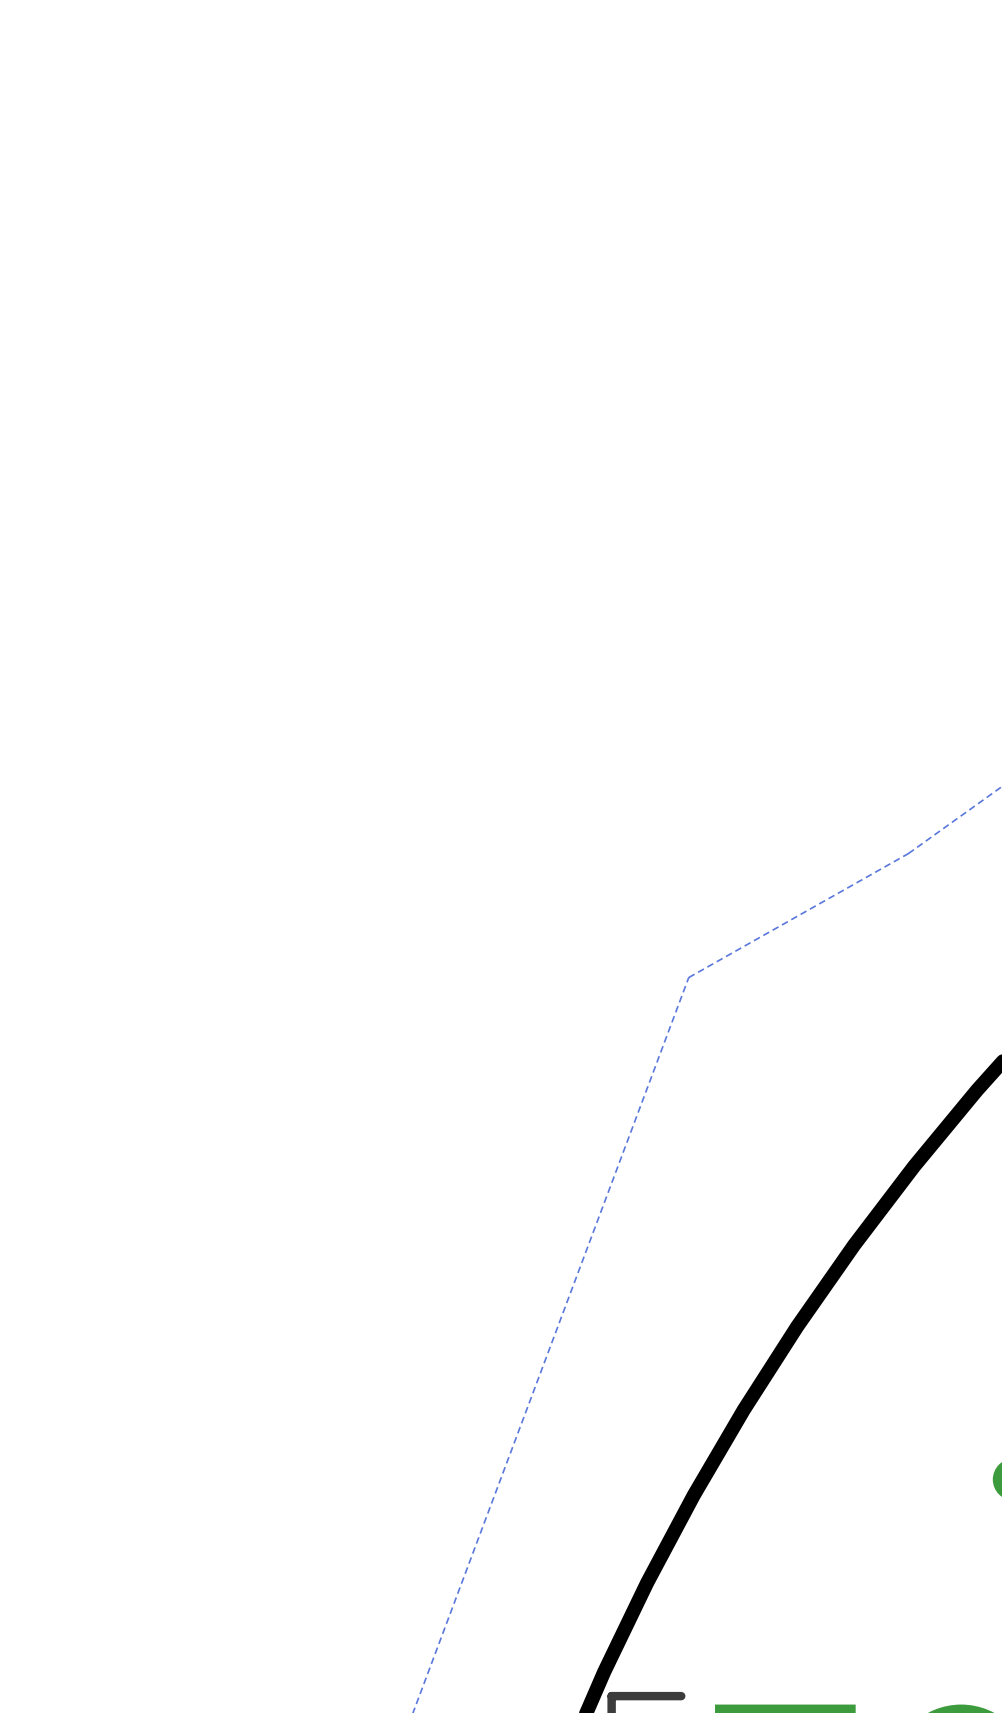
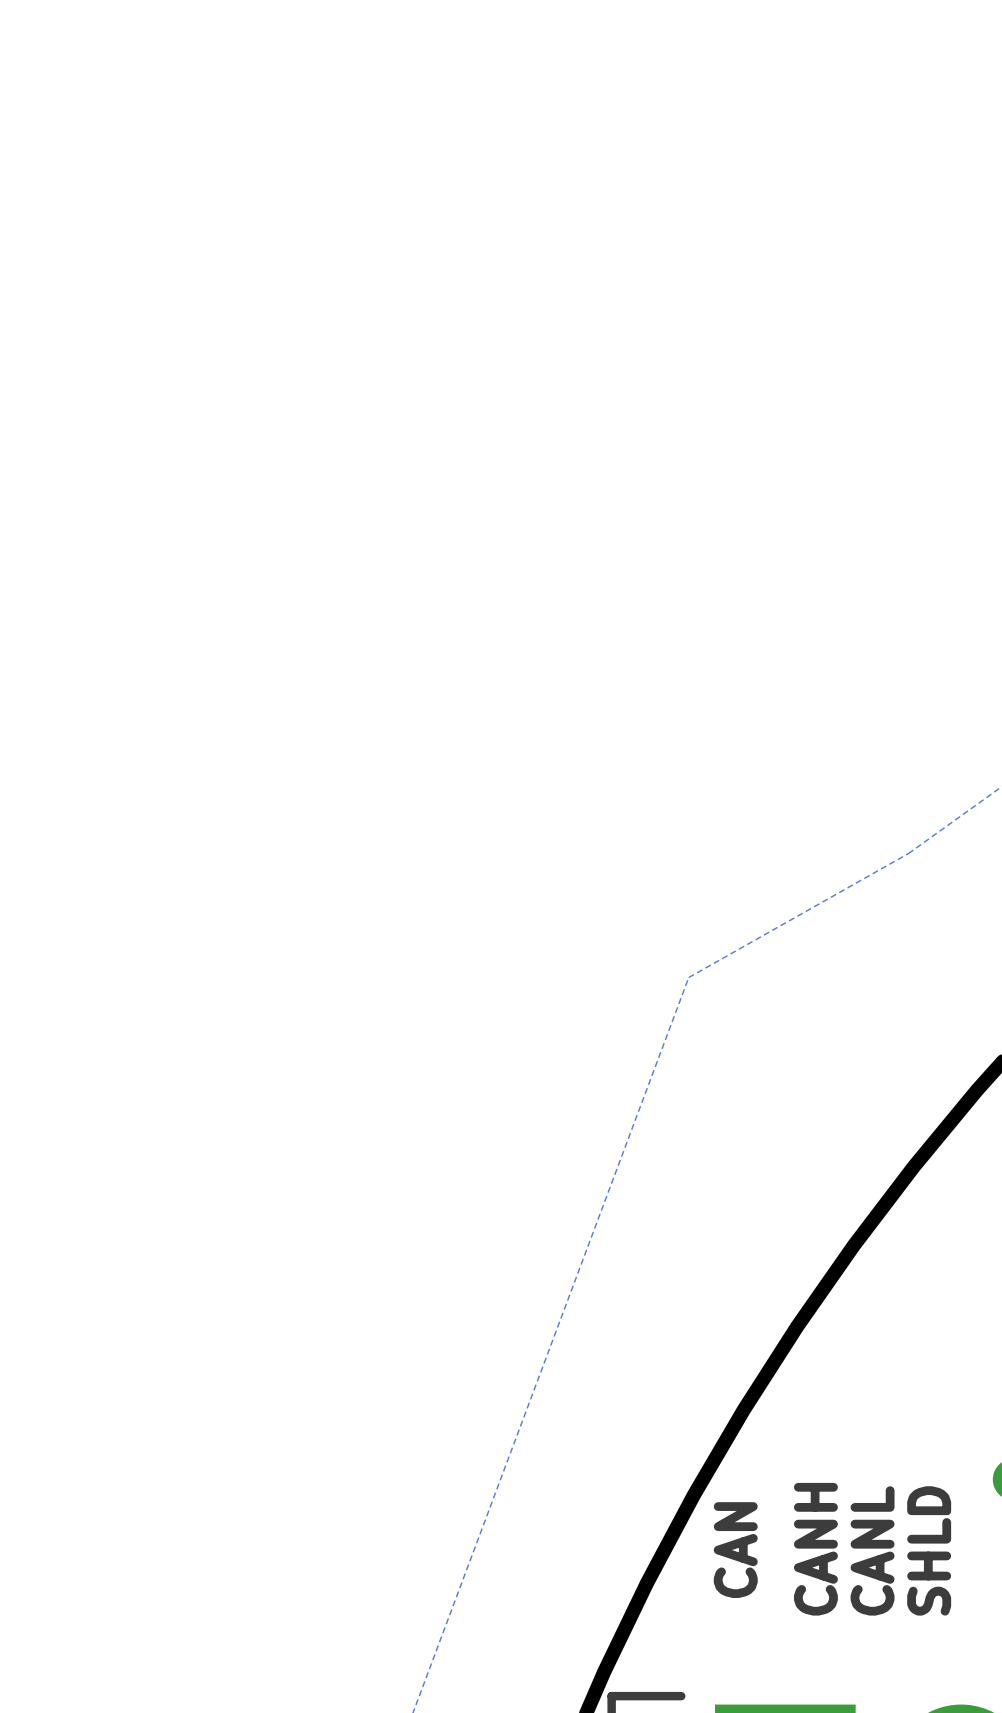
text: none -> CAN (735, 1550)
text: none -> CANL (872, 1550)
text: none -> CANH (815, 1549)
text: none -> SHLD (929, 1550)

